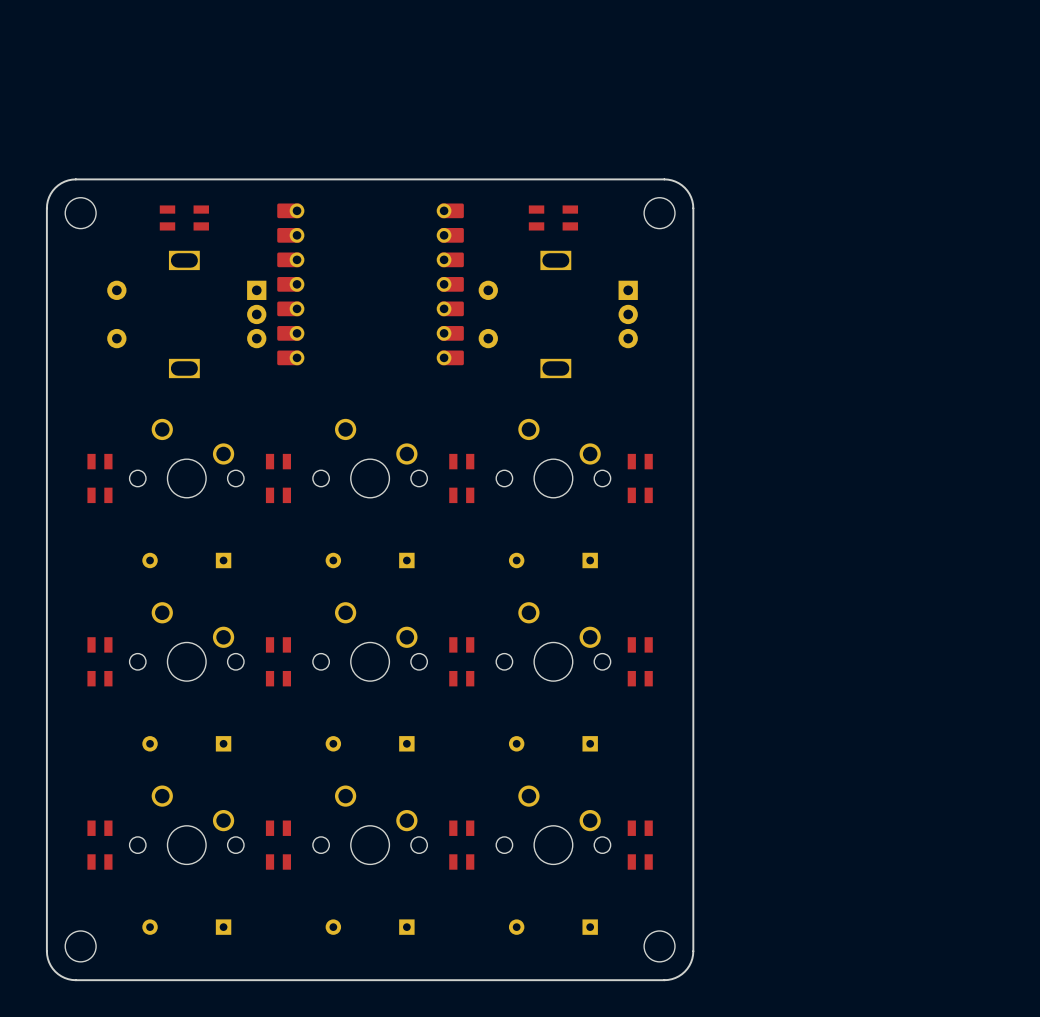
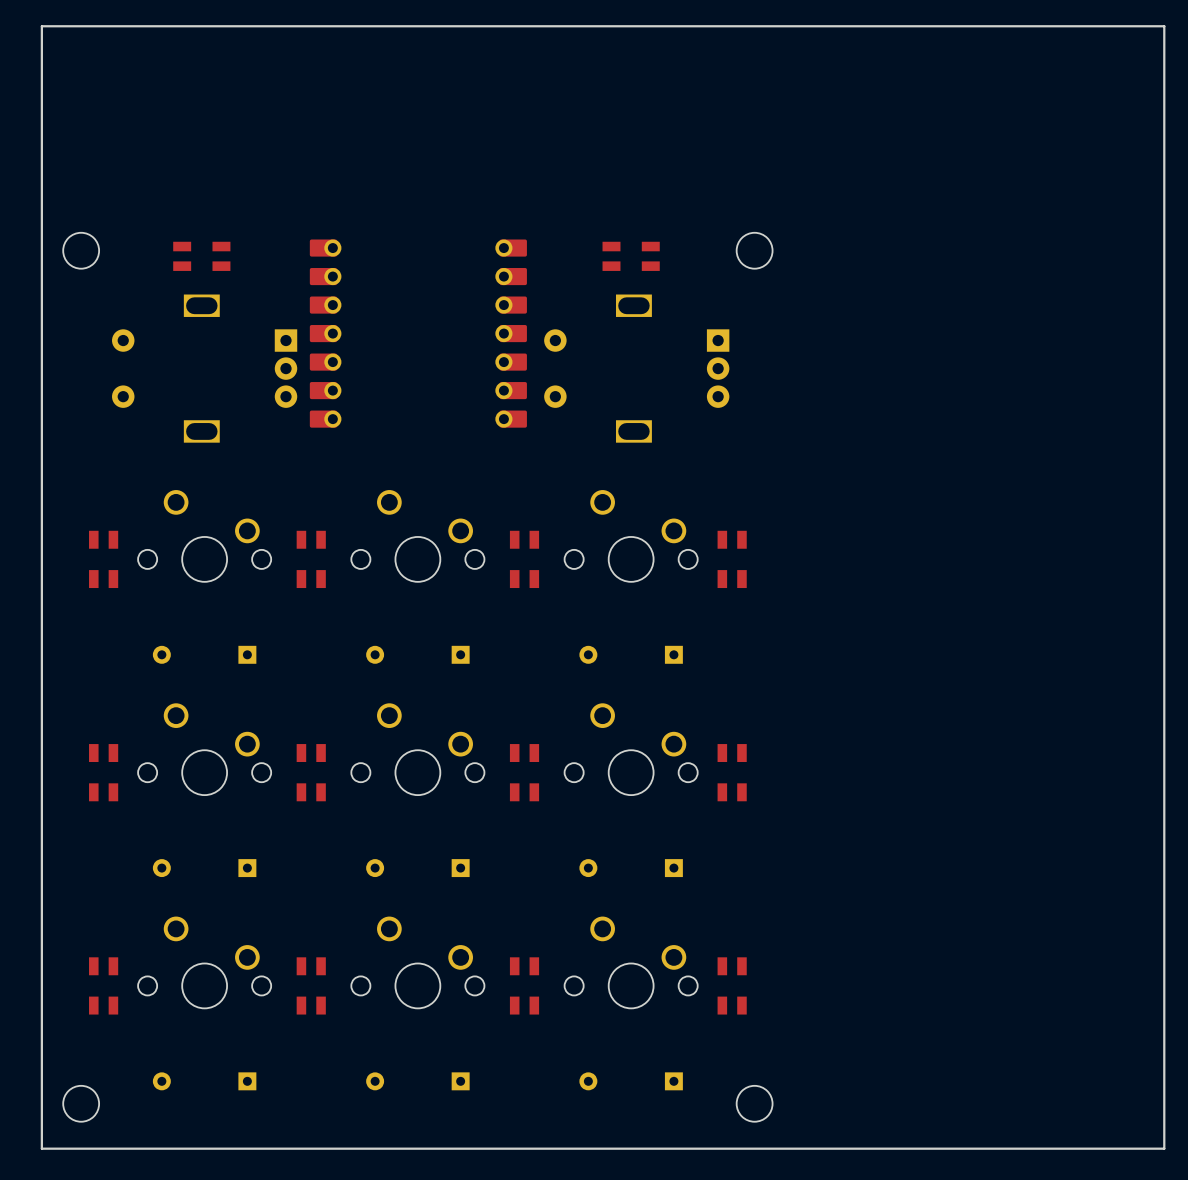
board edge: (46, 208) (49, 197) (55, 187) (64, 181) (75, 179) (664, 179) (675, 181) (684, 187) (691, 197) (693, 208) (693, 951) (687, 968) (678, 976) (664, 980) (75, 980) (64, 977) (55, 971) (49, 962) (46, 951) -> (41, 245) (41, 26) (1164, 26) (1164, 1148) (41, 1148) (41, 1109)

